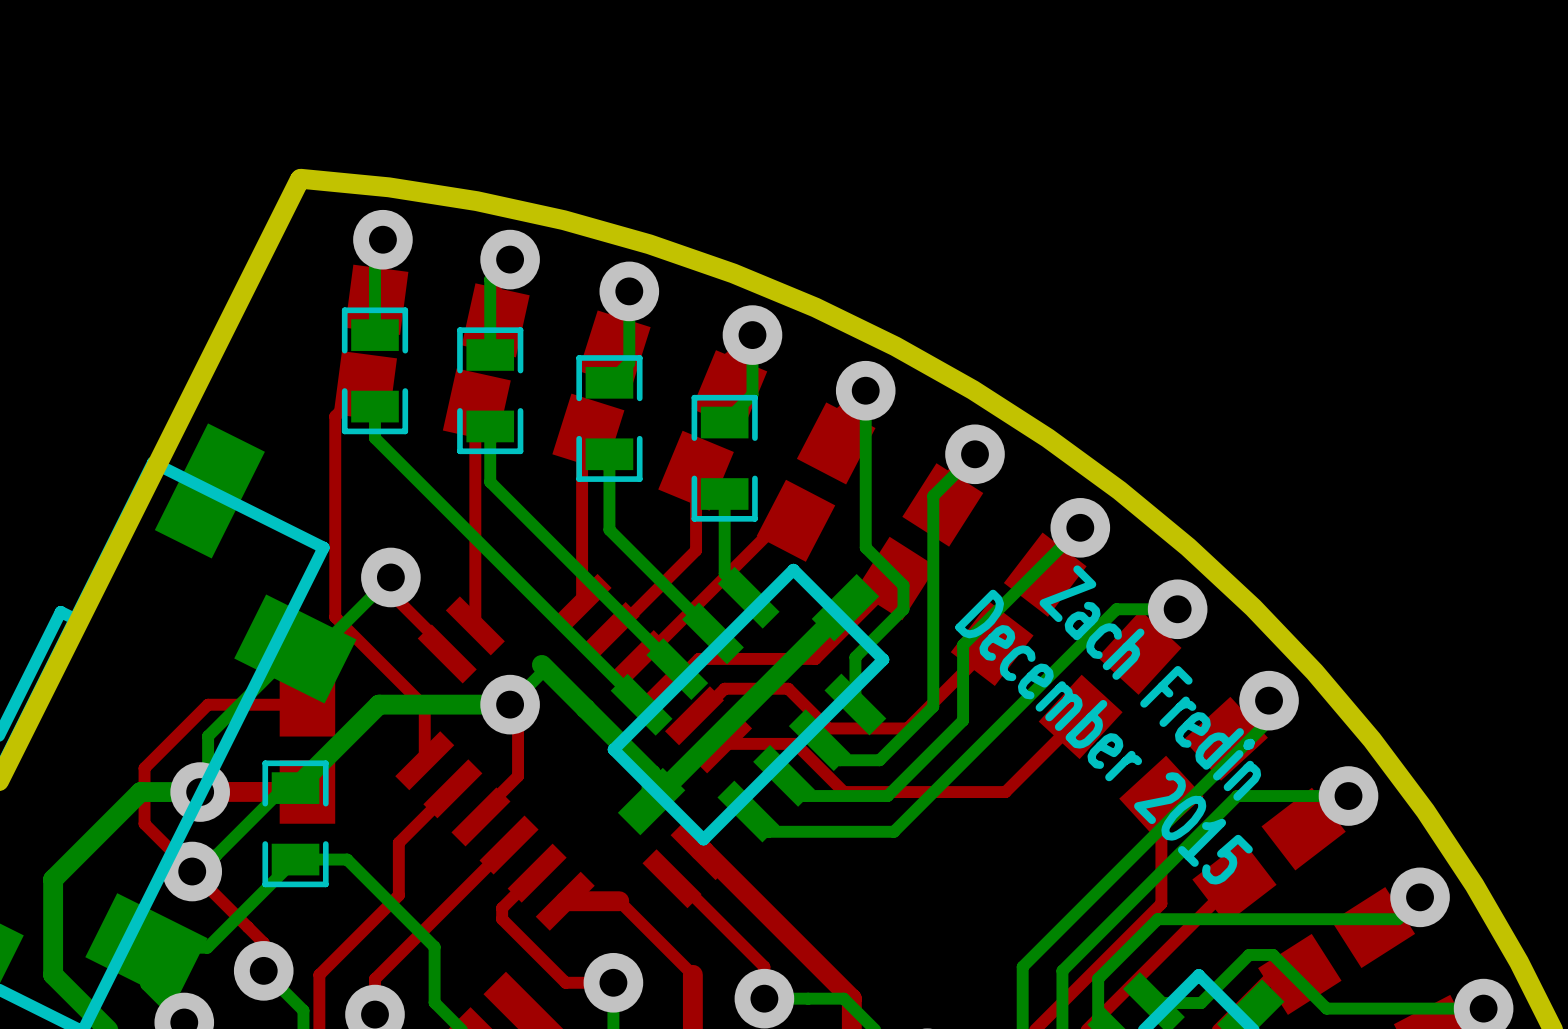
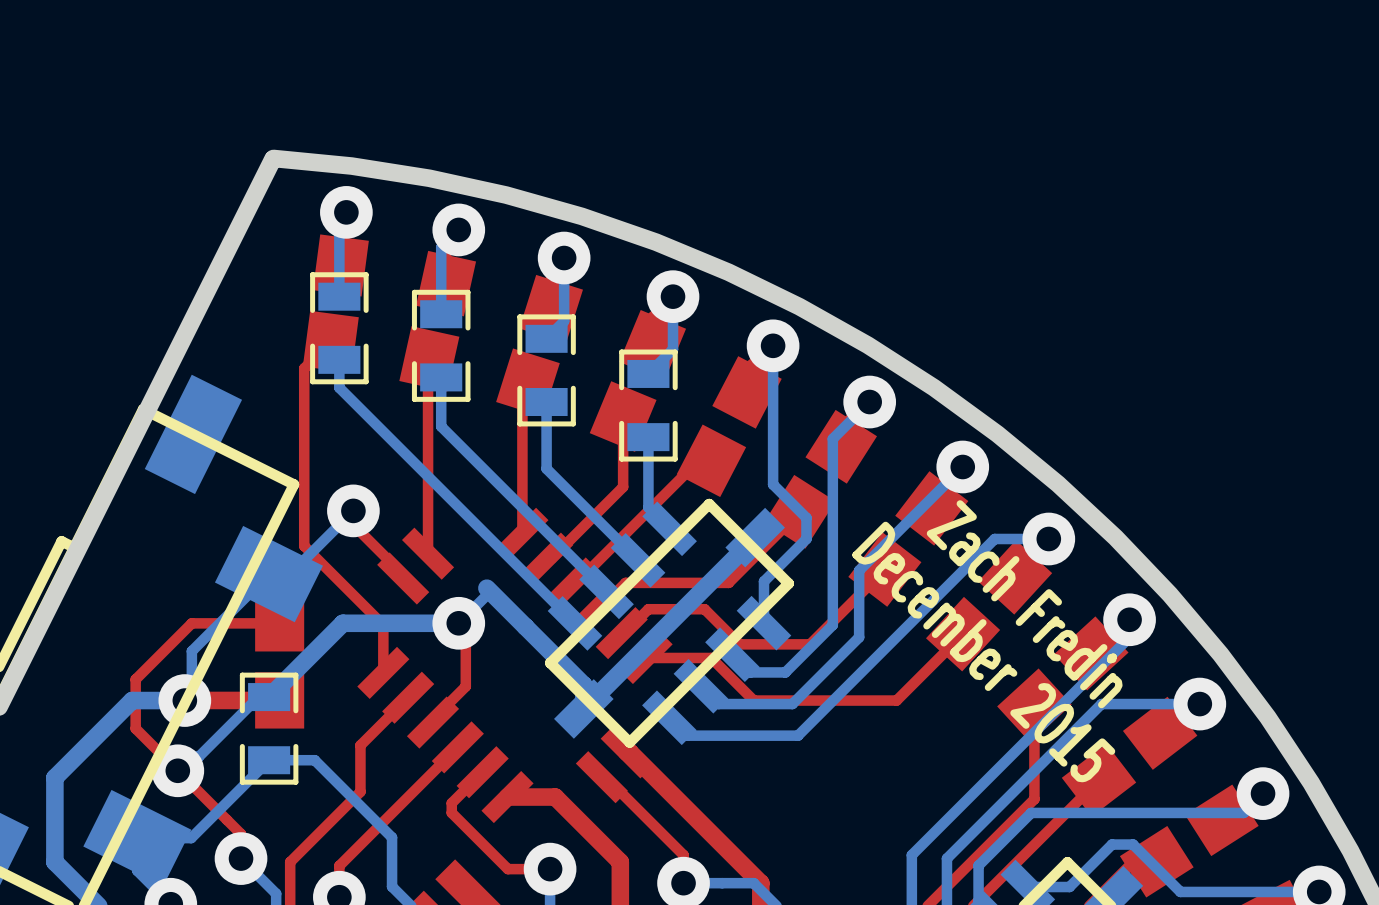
top track width: thin (619, 901) (692, 974) -> thick (555, 797) (620, 862)

